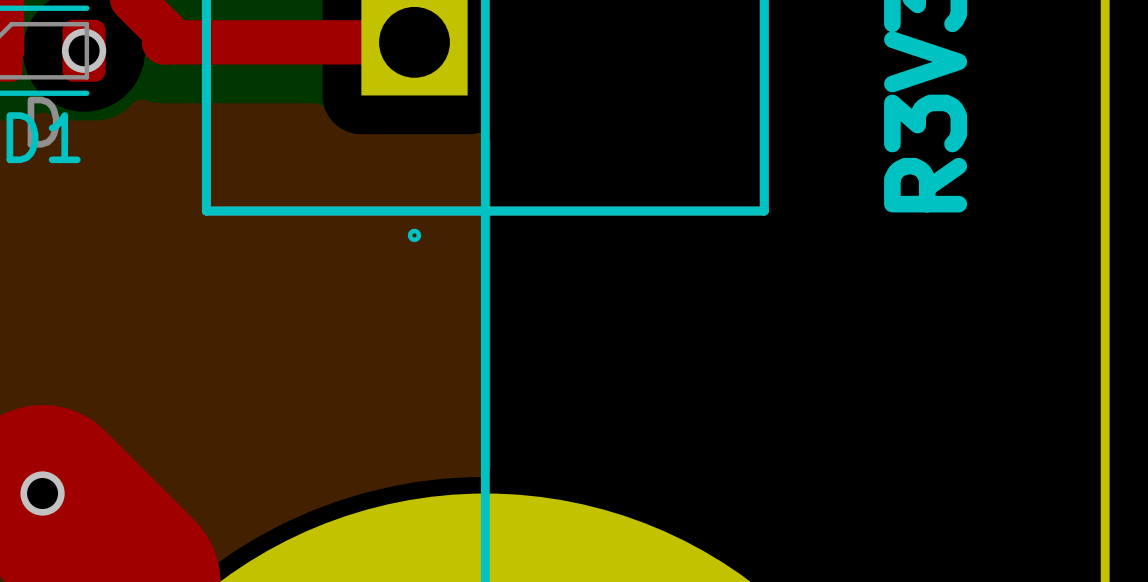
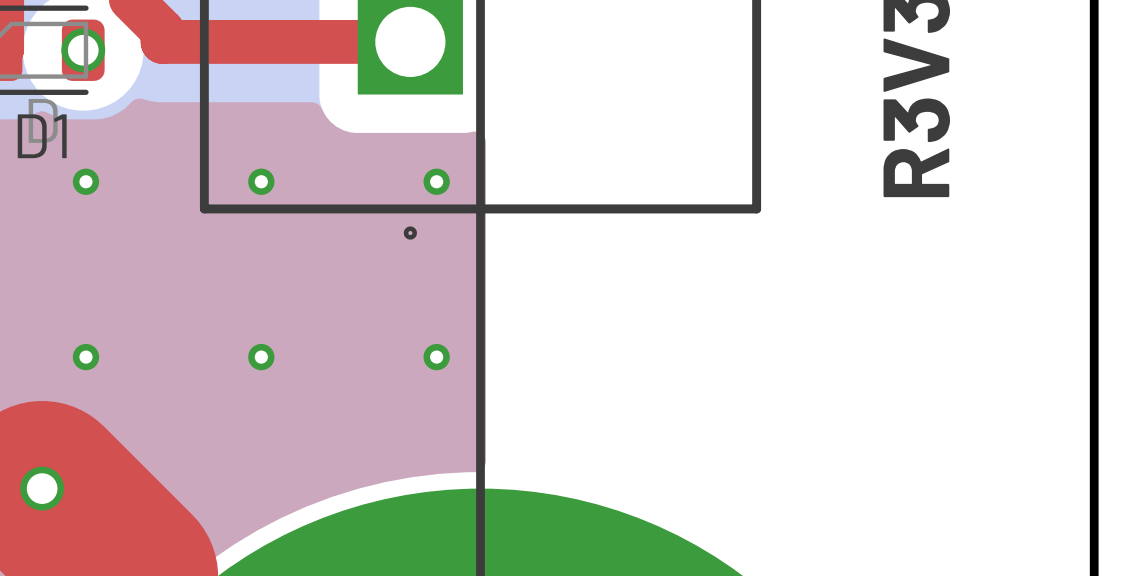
via: none -> (85, 181)
via: none -> (261, 181)
via: none -> (436, 181)
via: none -> (85, 357)
via: none -> (261, 357)
via: none -> (436, 357)

